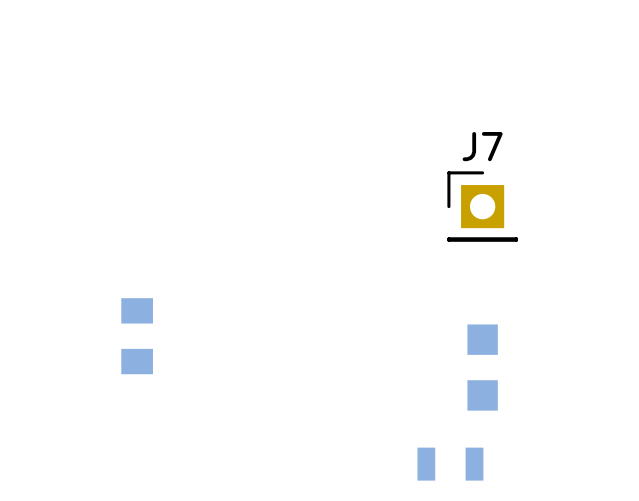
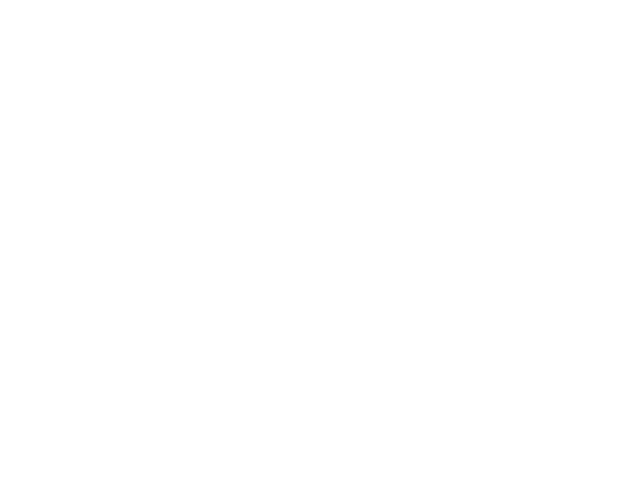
J7: (482, 206) -> none
part: (137, 336) -> none
part: (482, 367) -> none
part: (450, 464) -> none

